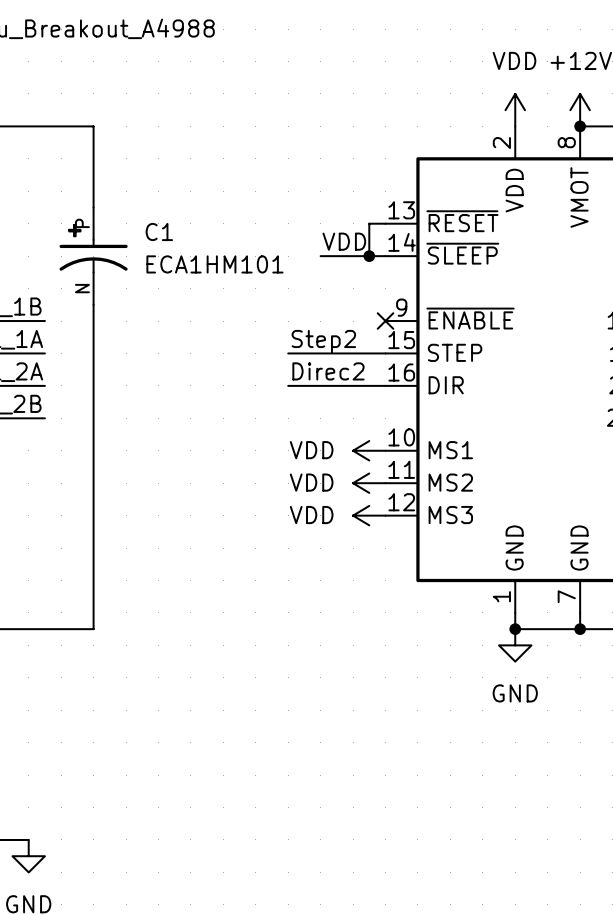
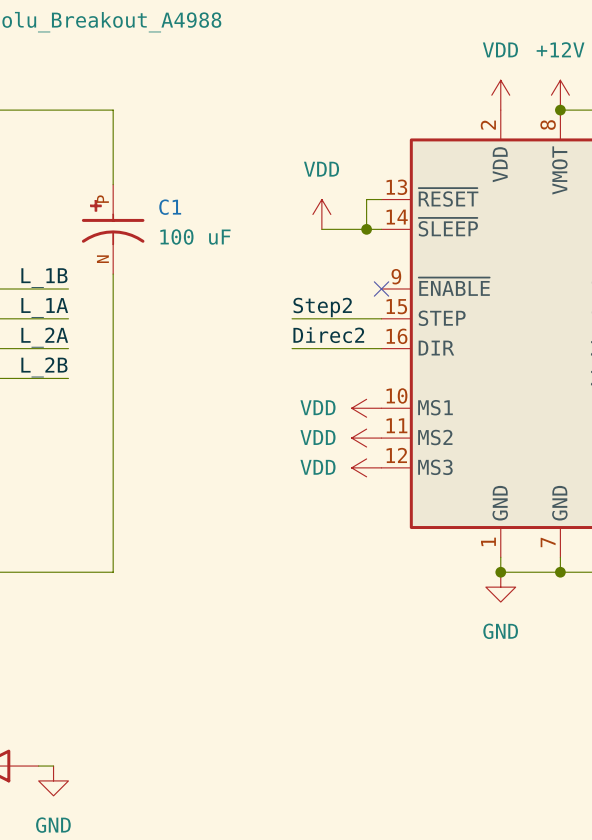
power symbol: none -> VDD (321, 214)
label: VDD (344, 241) -> none
C1 value: ECA1HM101 (214, 264) -> 100 uF (195, 236)

